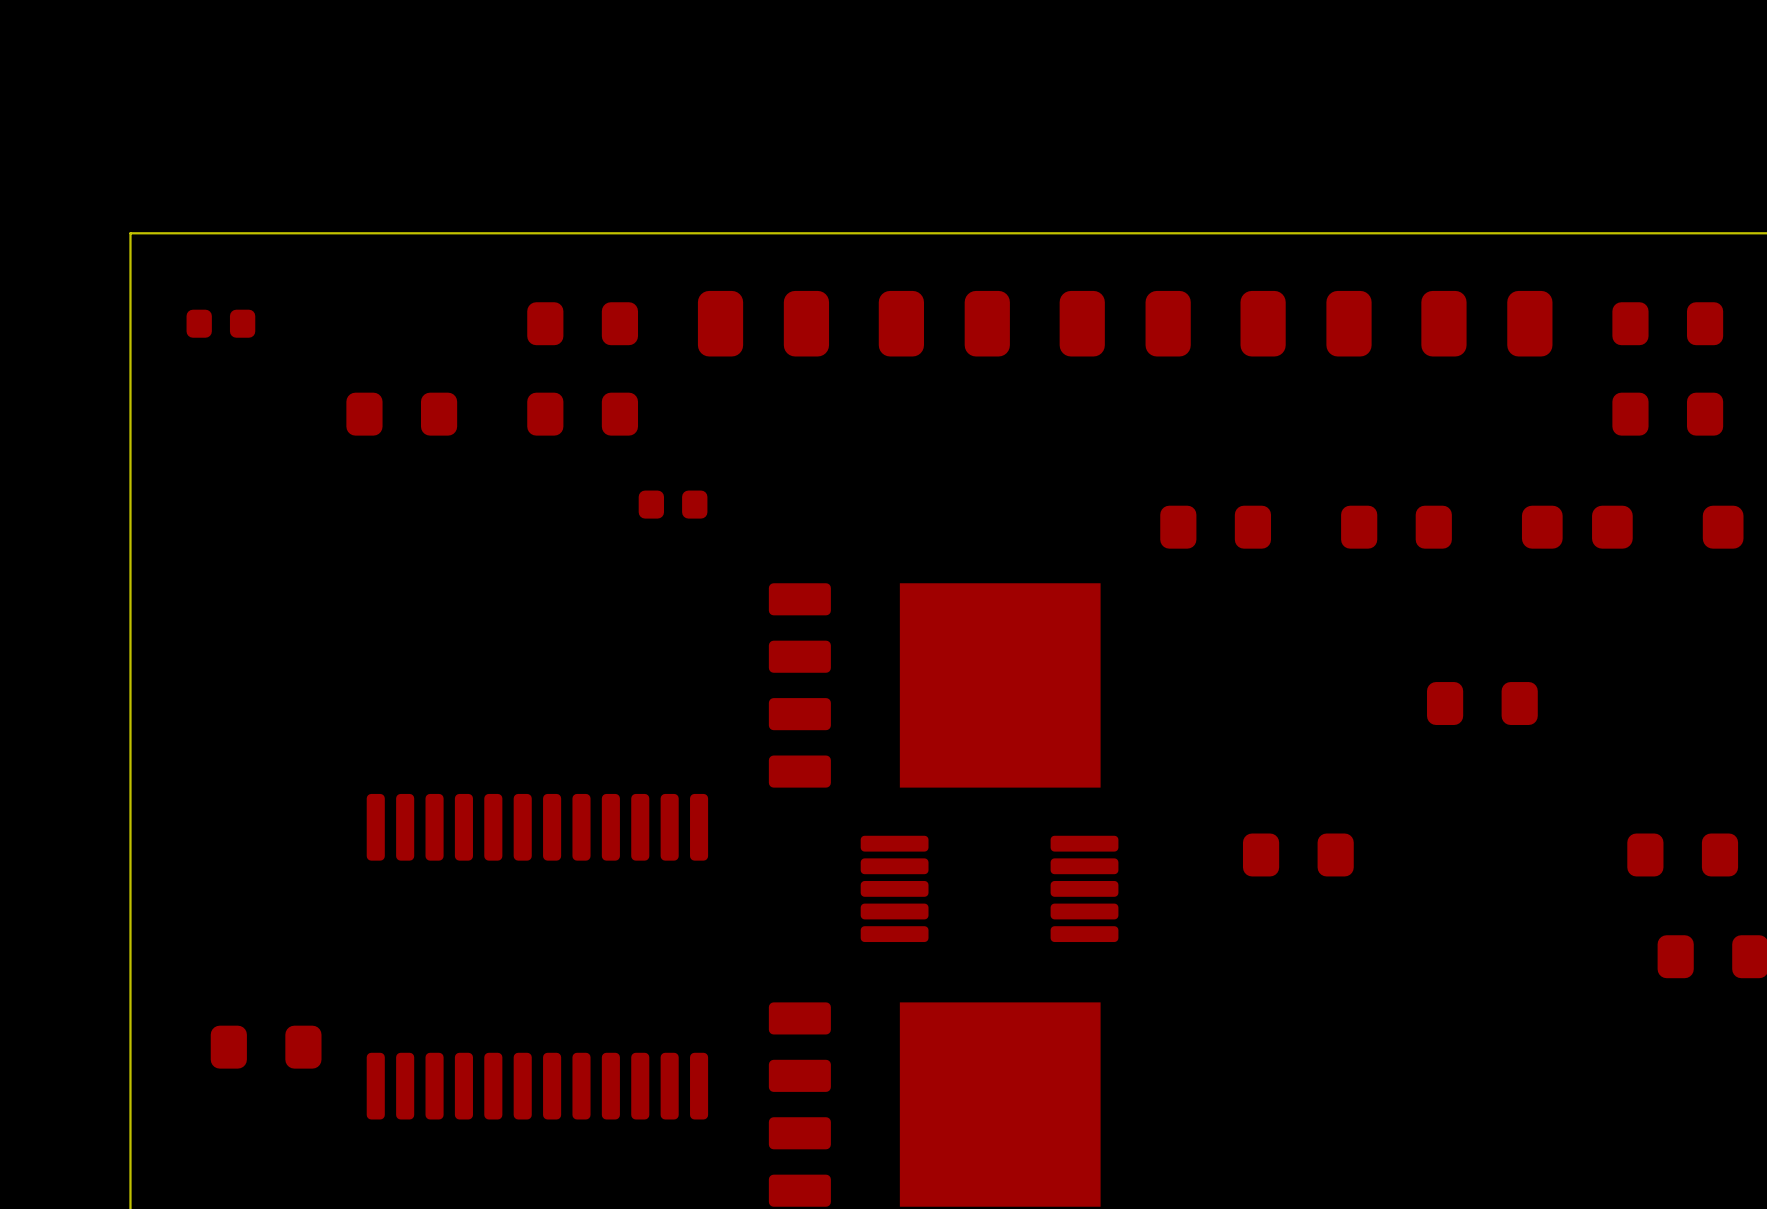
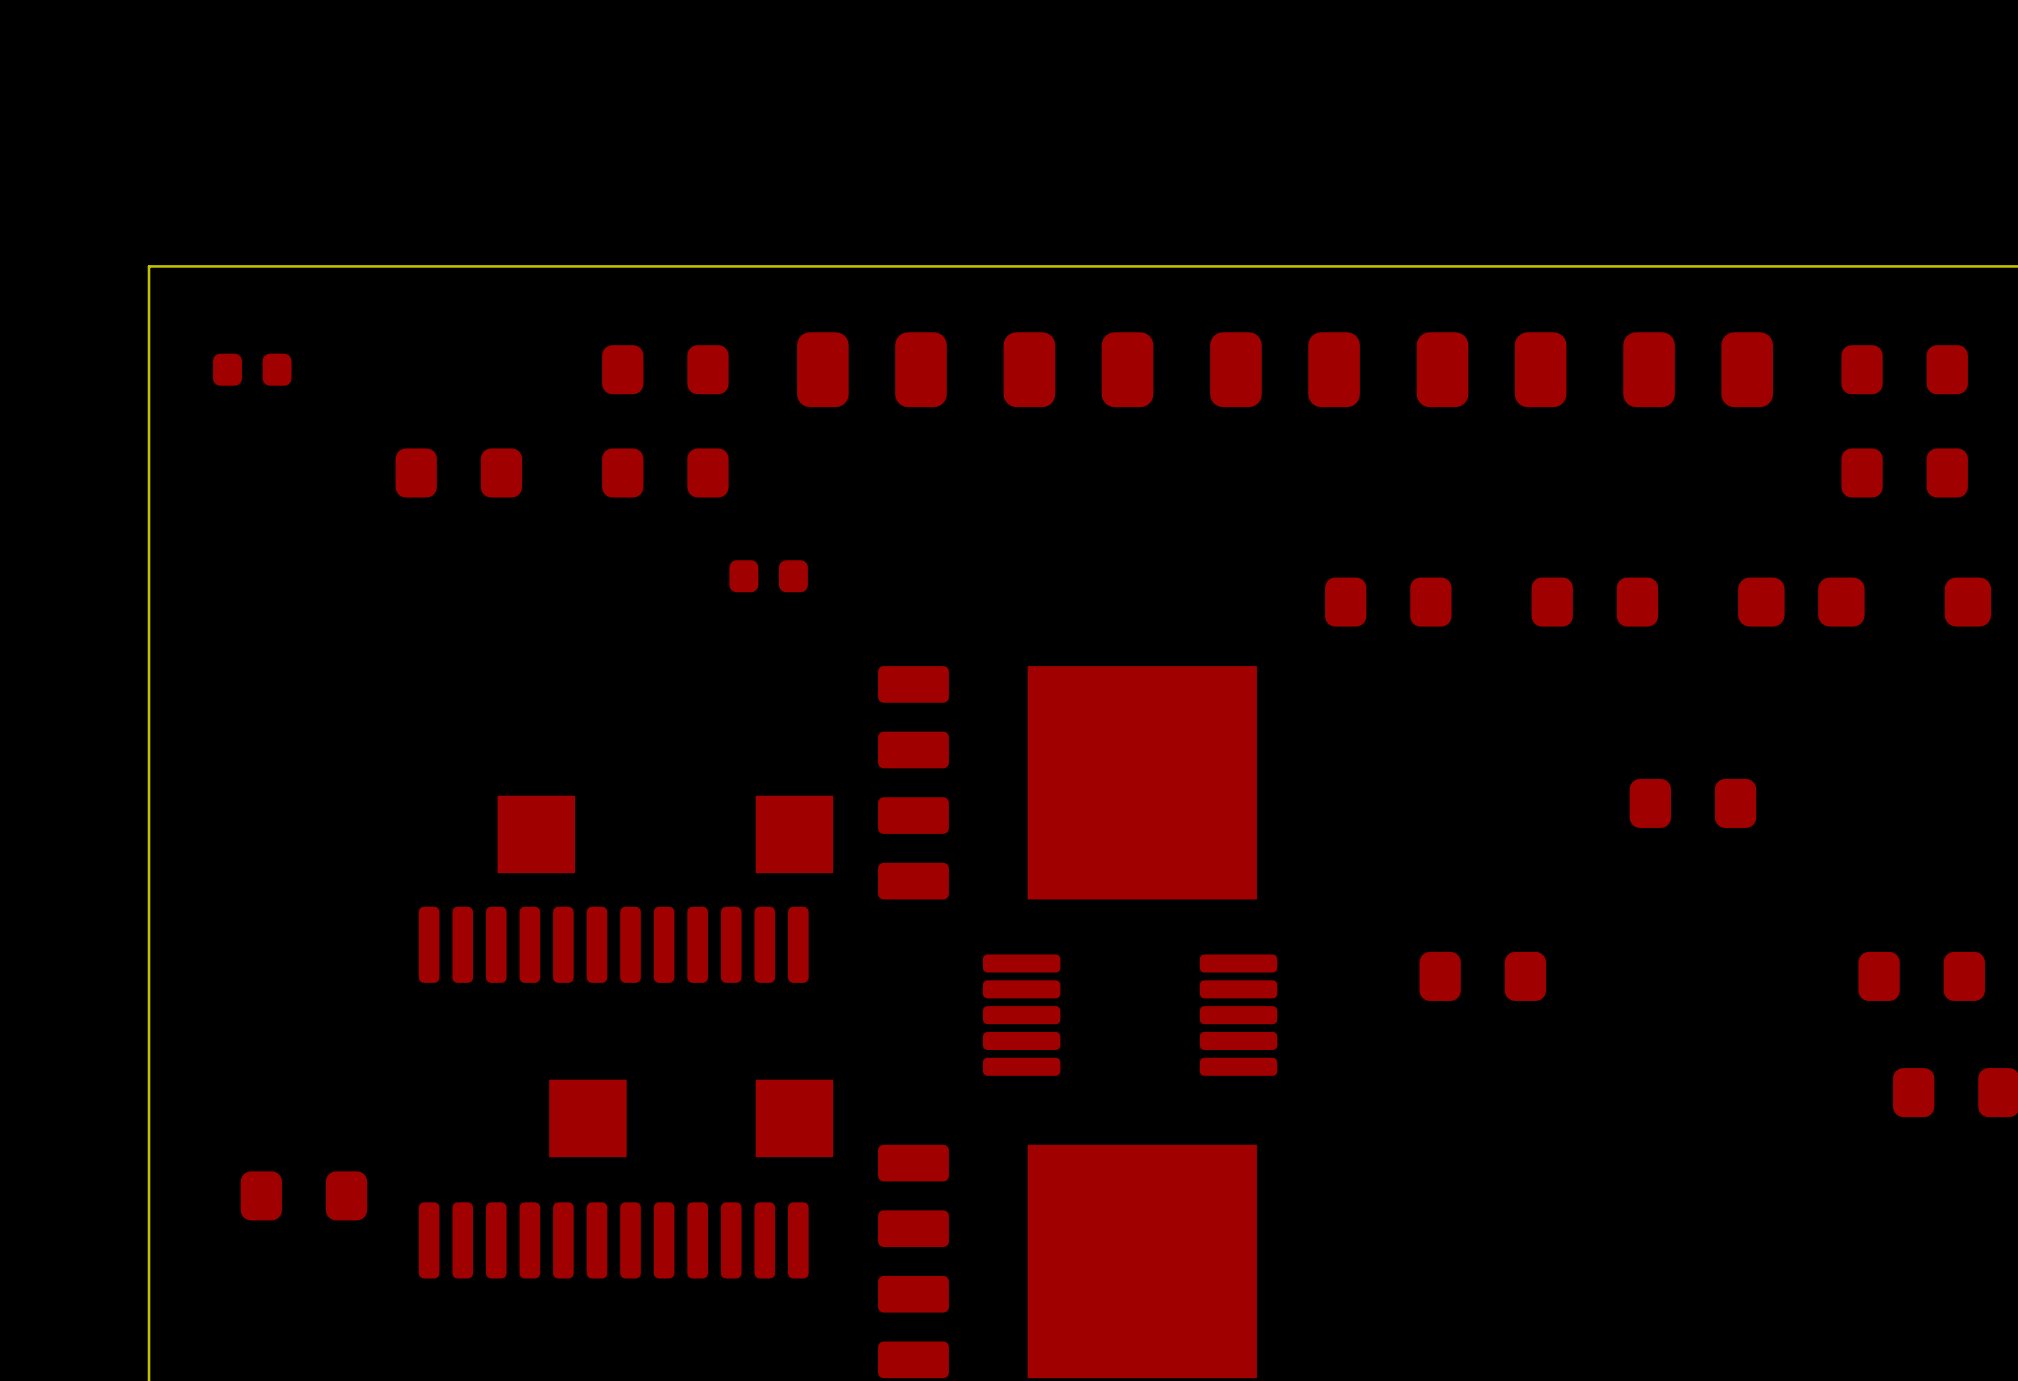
part: none -> (536, 834)
part: none -> (794, 834)
part: none -> (587, 1118)
part: none -> (794, 1118)

